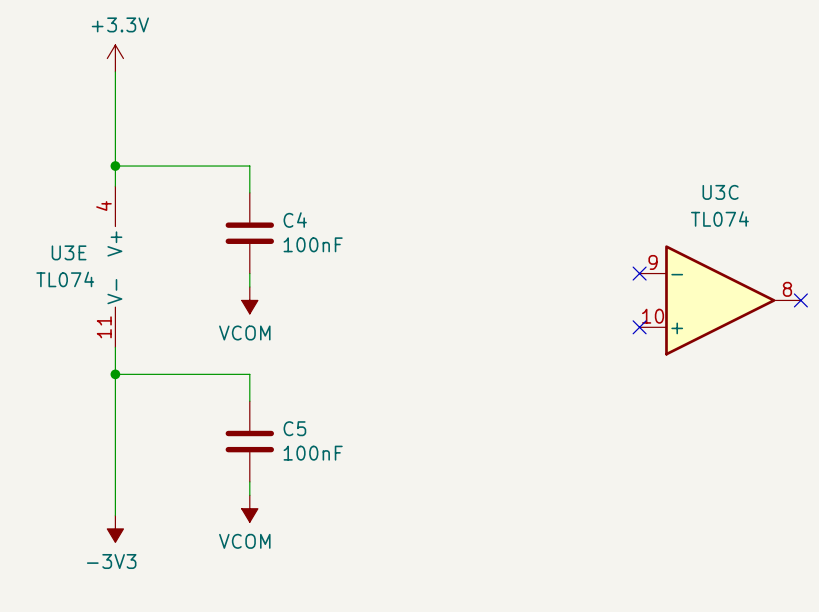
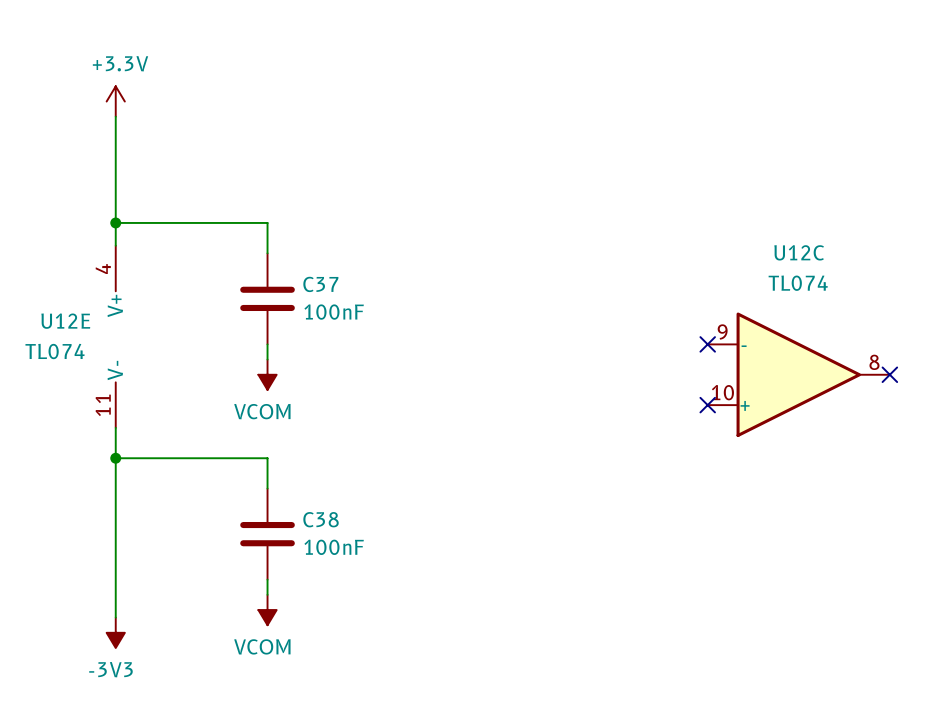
U3C name: U3C (720, 192) -> U12C (799, 252)
C4 name: C4 (295, 220) -> C37 (320, 284)
U3E name: U3E (69, 252) -> U12E (65, 321)
C5 name: C5 (294, 428) -> C38 (321, 519)

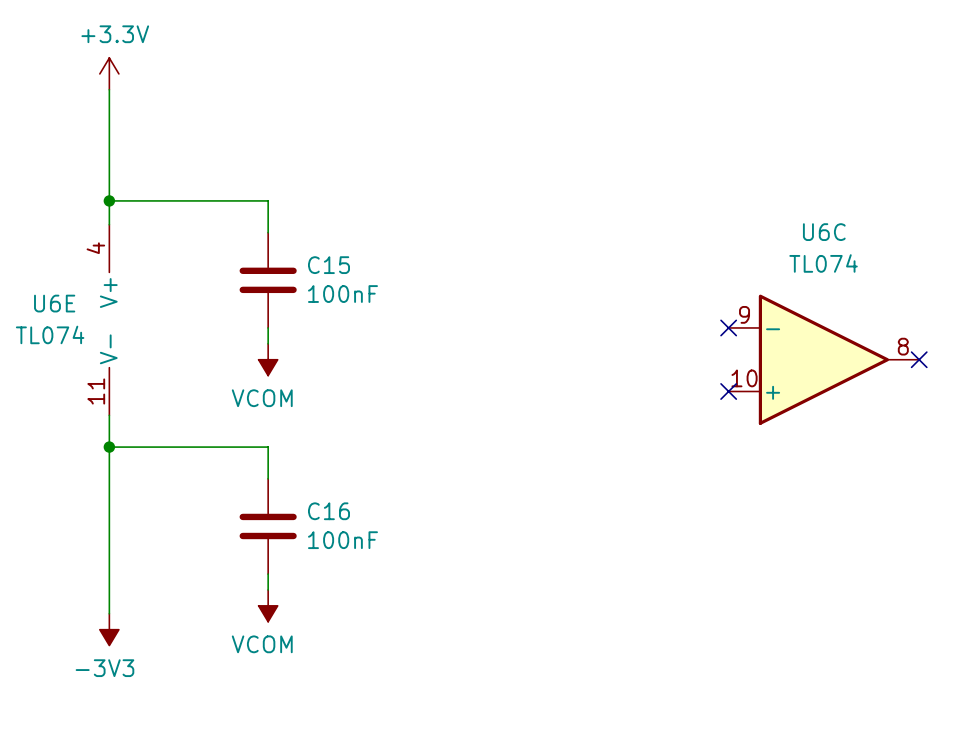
U12C name: U12C (799, 252) -> U6C (824, 232)
C37 name: C37 (320, 284) -> C15 (328, 265)
U12E name: U12E (65, 321) -> U6E (54, 303)
C38 name: C38 (321, 519) -> C16 (328, 511)

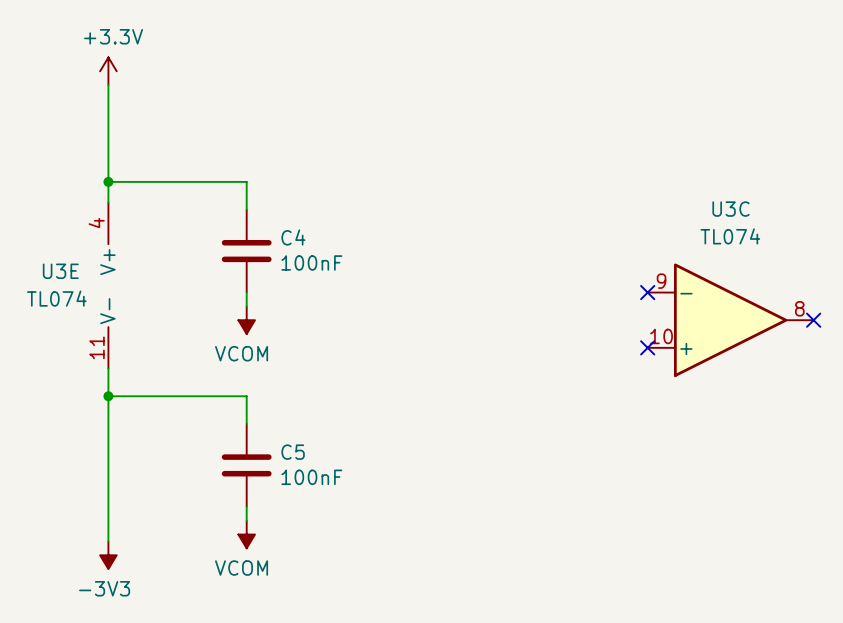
U6C name: U6C (824, 232) -> U3C (731, 209)
C15 name: C15 (328, 265) -> C4 (293, 237)
U6E name: U6E (54, 303) -> U3E (60, 271)
C16 name: C16 (328, 511) -> C5 (293, 452)

